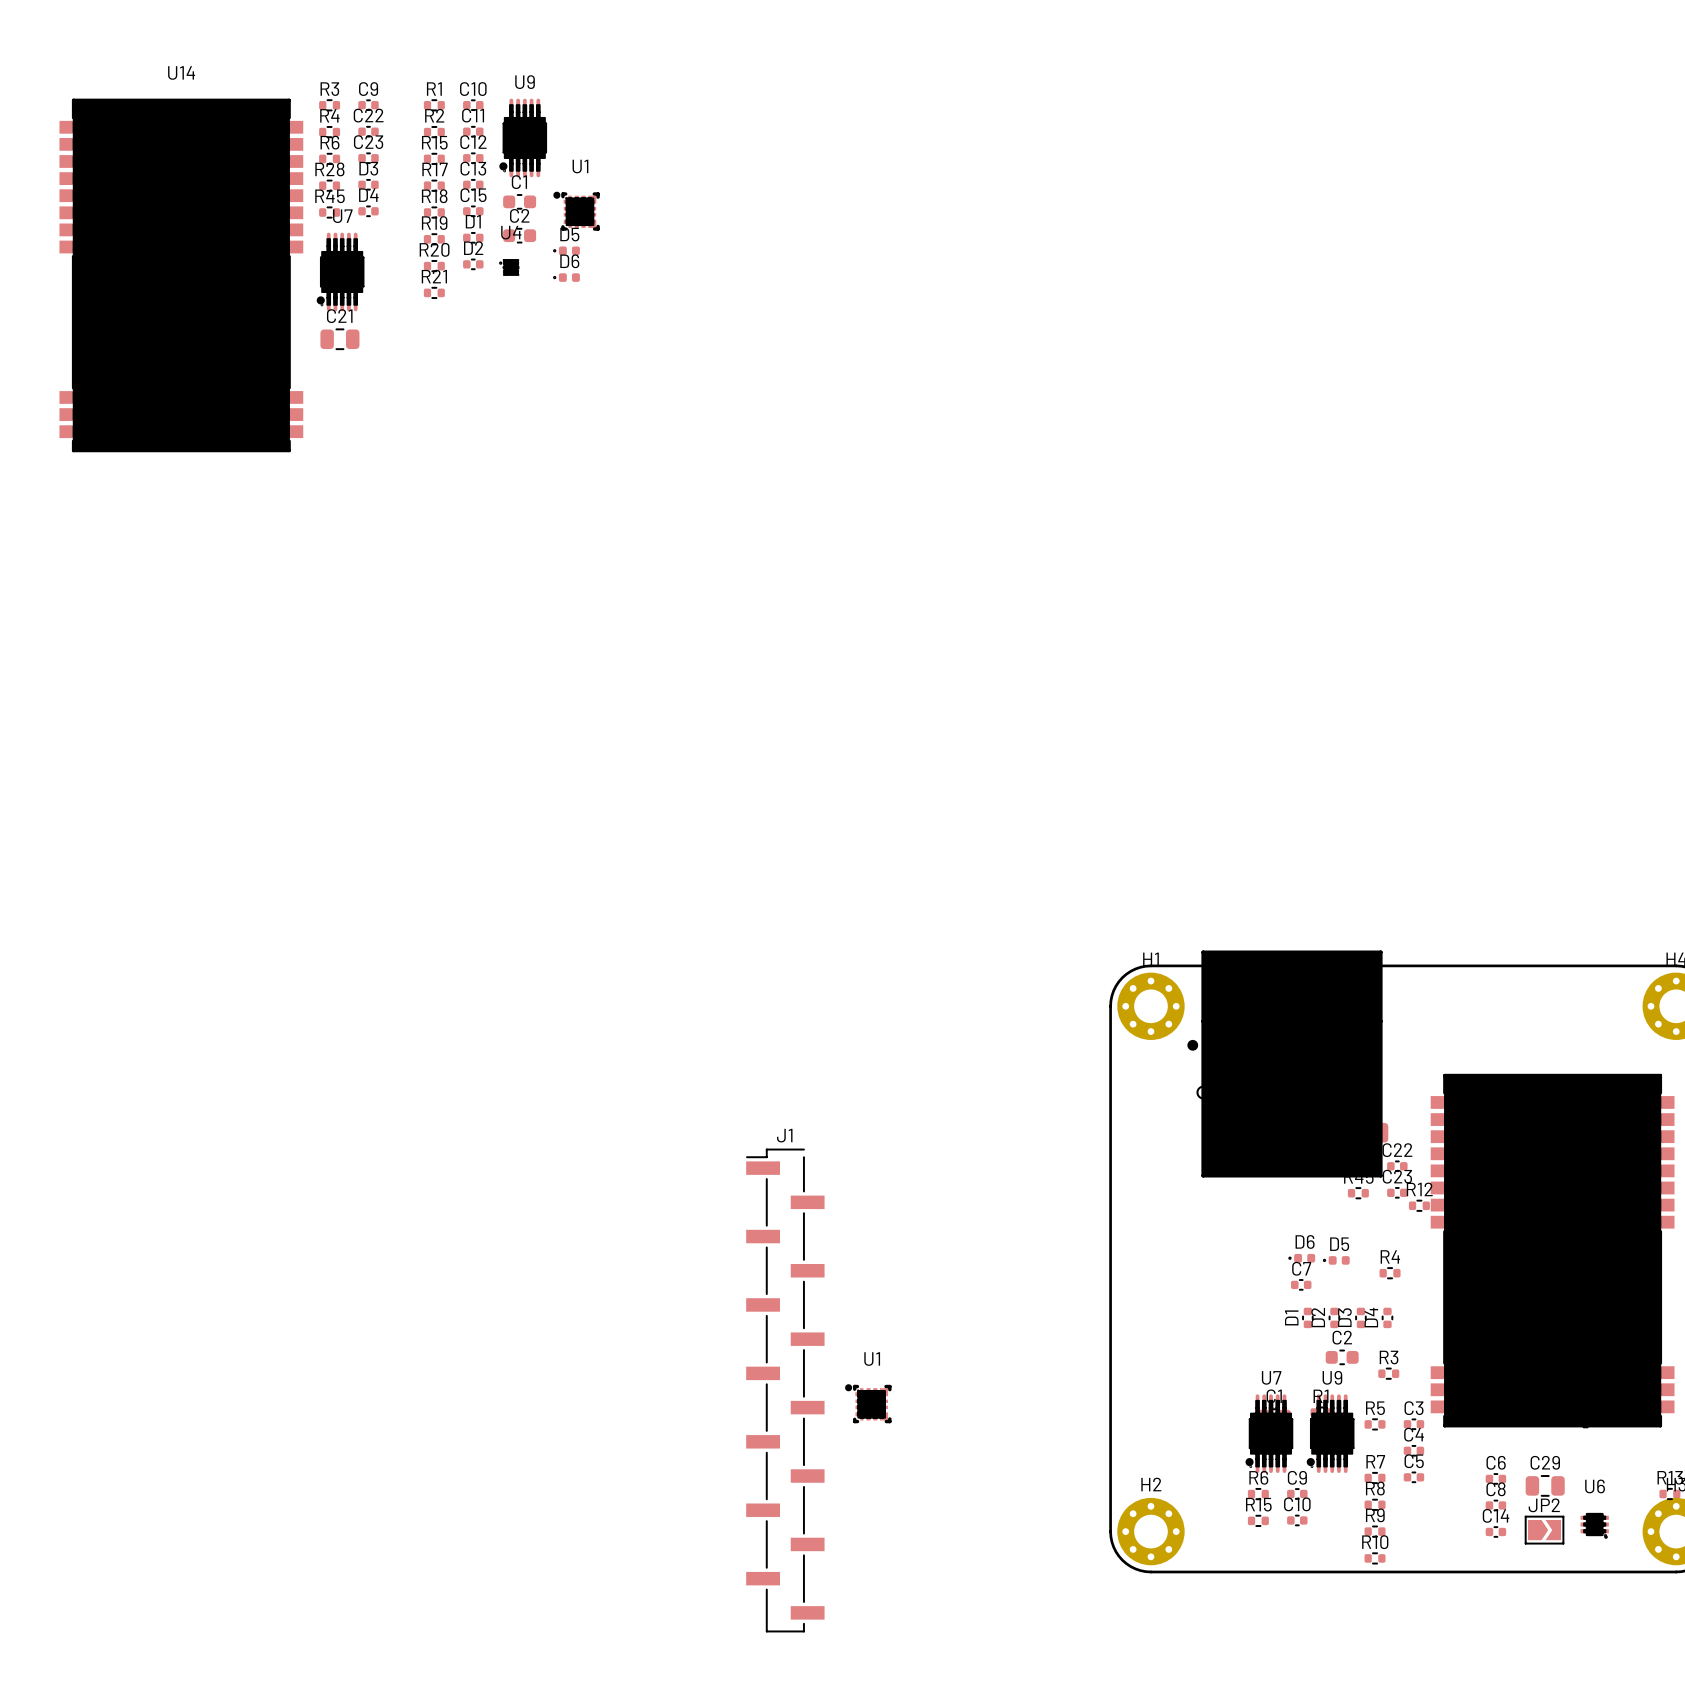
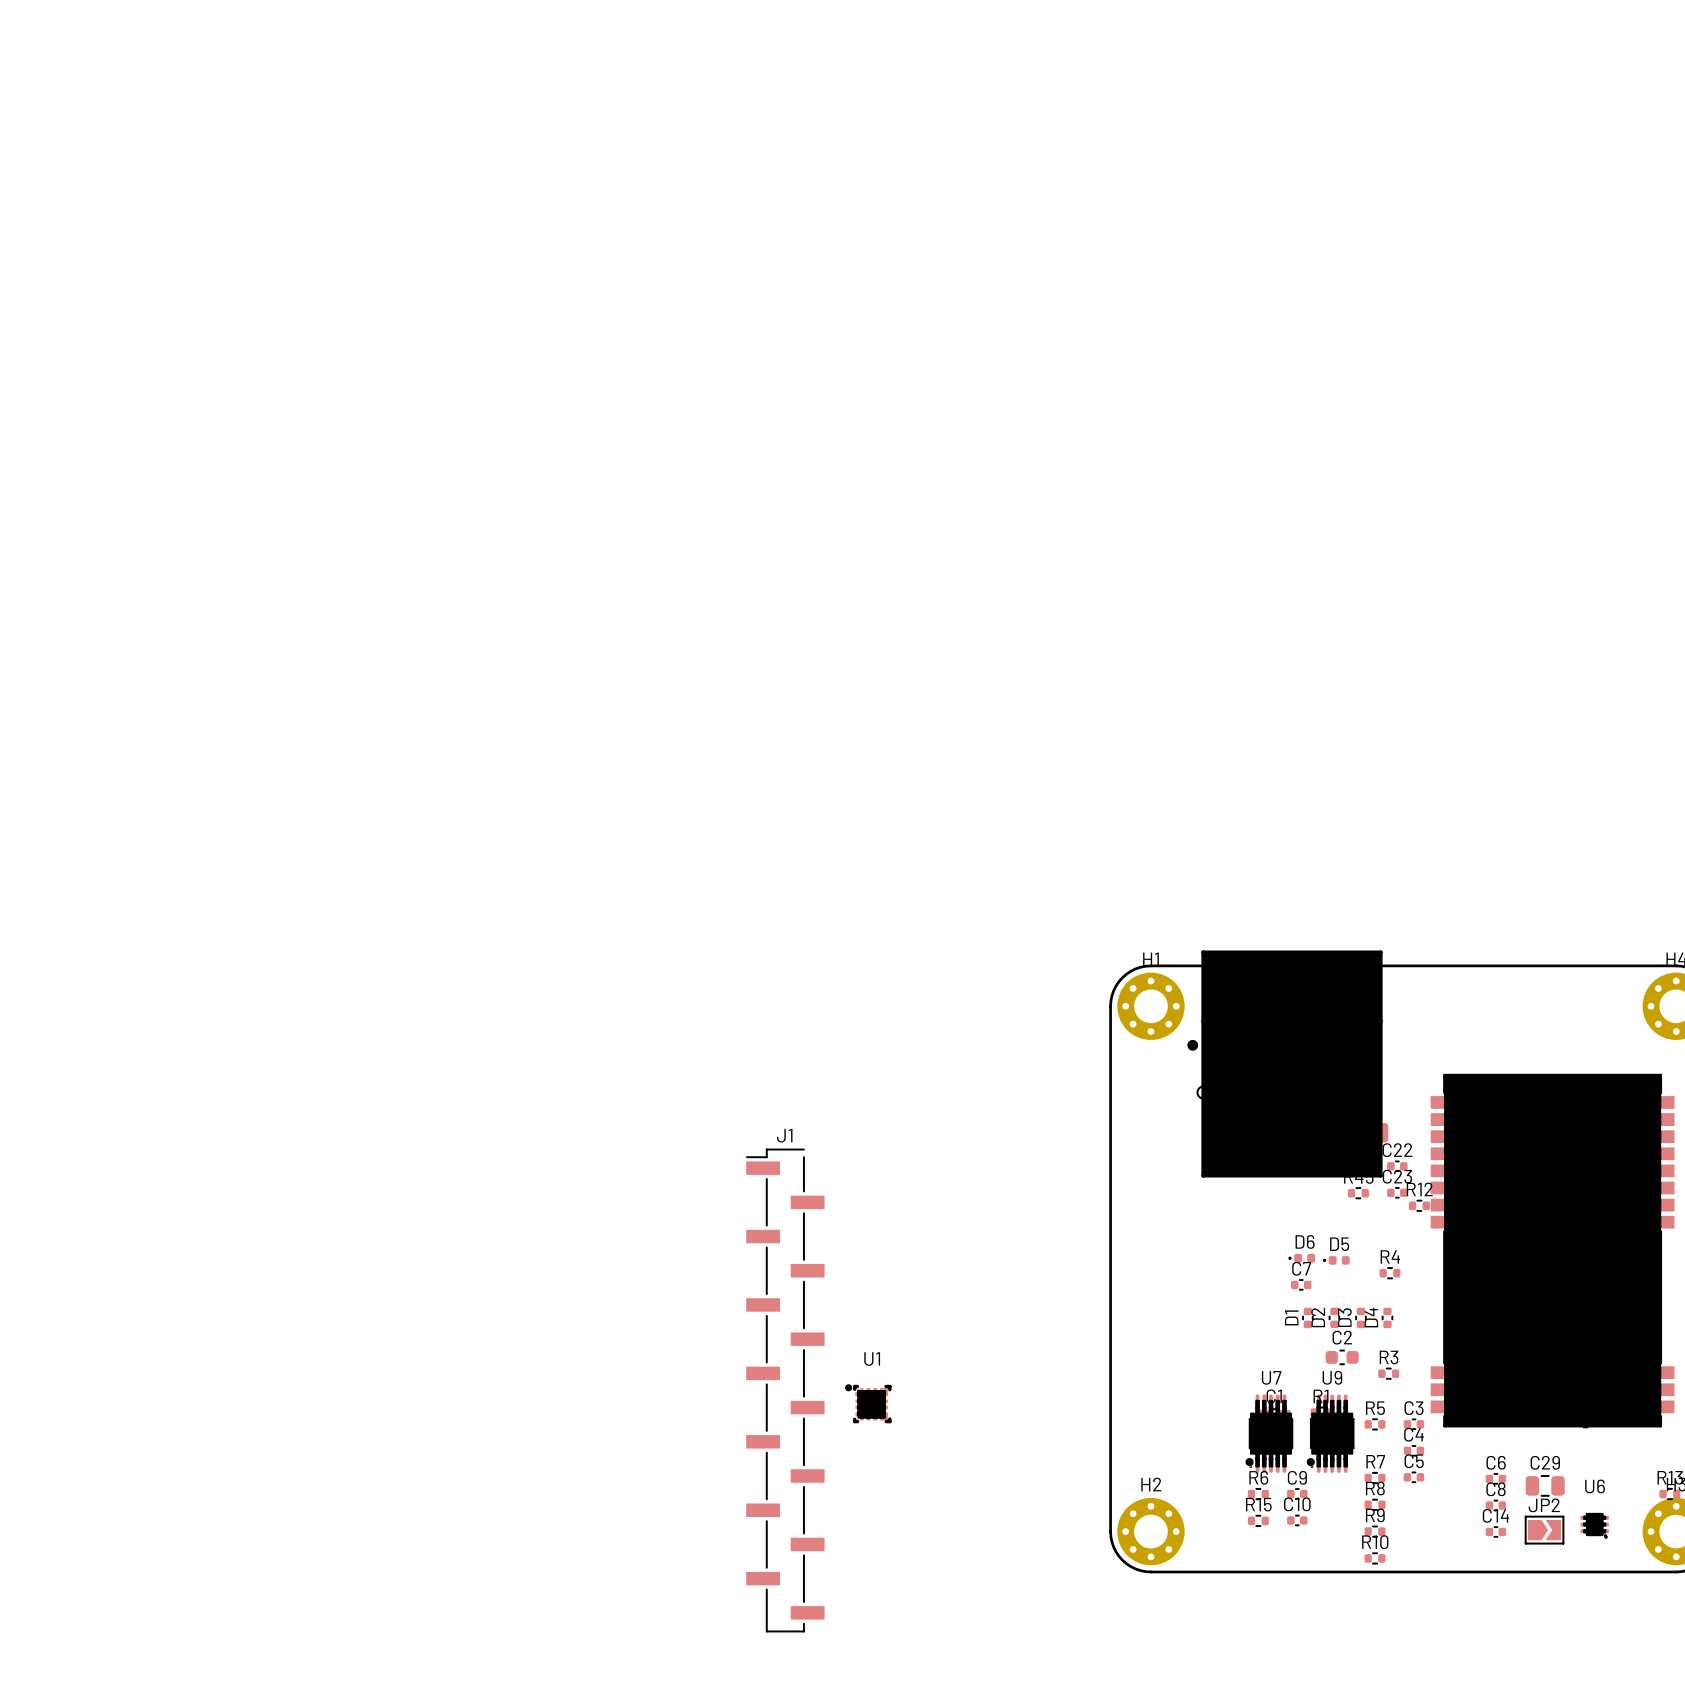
R3: (329, 105) -> none
C9: (368, 105) -> none
R1: (434, 105) -> none
C10: (473, 105) -> none
C22: (368, 131) -> none
C11: (473, 131) -> none
R4: (329, 132) -> none
R2: (434, 132) -> none
U9: (523, 137) -> none
R6: (329, 158) -> none
C23: (368, 158) -> none
R15: (434, 158) -> none
C12: (473, 158) -> none
D3: (368, 184) -> none
C13: (473, 184) -> none
R28: (329, 185) -> none
R17: (434, 185) -> none
C1: (519, 201) -> none
D4: (368, 211) -> none
C15: (473, 211) -> none
U1: (576, 211) -> none
R45: (329, 212) -> none
R18: (434, 212) -> none
C2: (519, 235) -> none
D1: (473, 237) -> none
R19: (434, 239) -> none
D5: (566, 250) -> none
D2: (473, 264) -> none
R20: (434, 266) -> none
U4: (509, 267) -> none
U7: (340, 271) -> none
U14: (181, 275) -> none
D6: (566, 277) -> none
R21: (434, 292) -> none
C21: (339, 339) -> none

